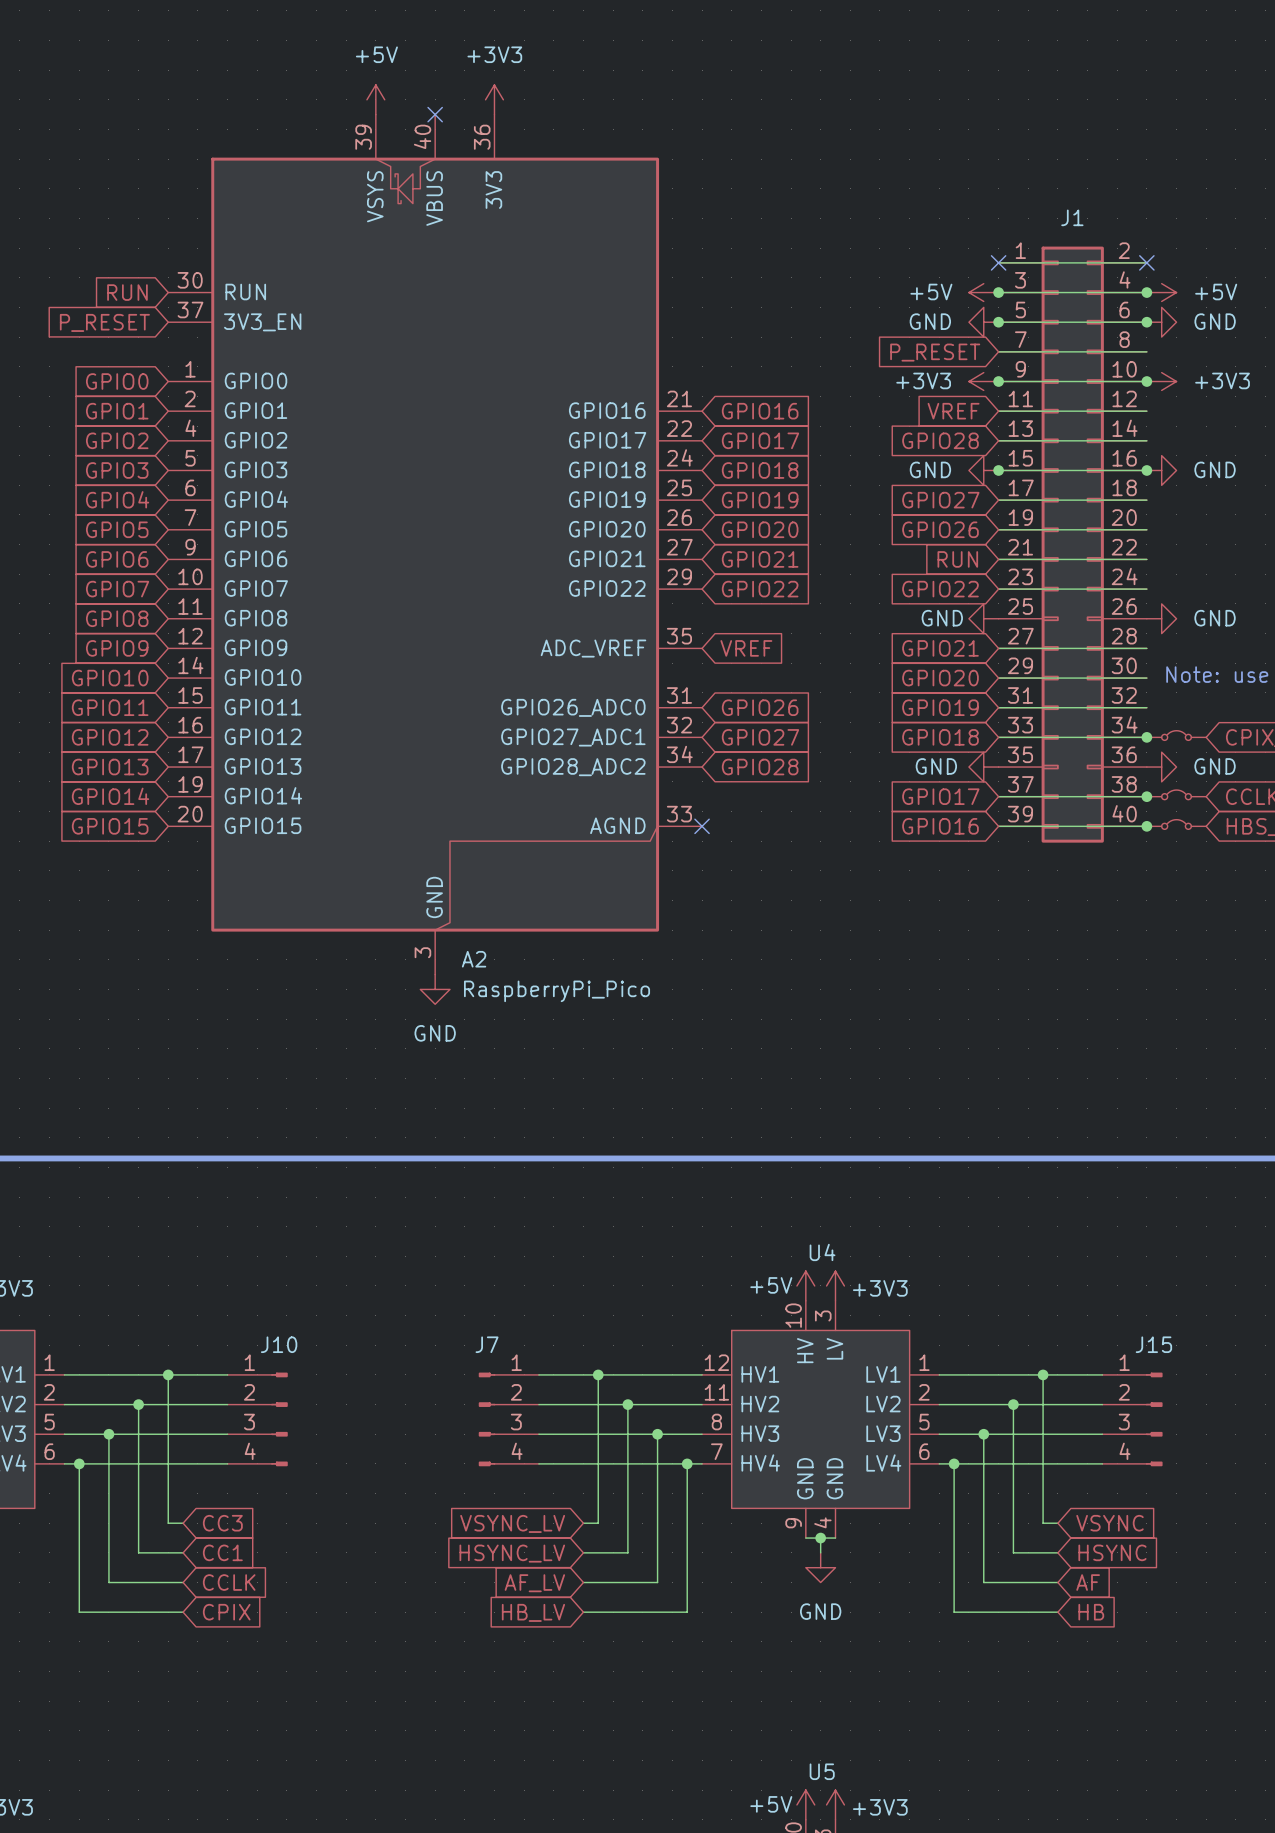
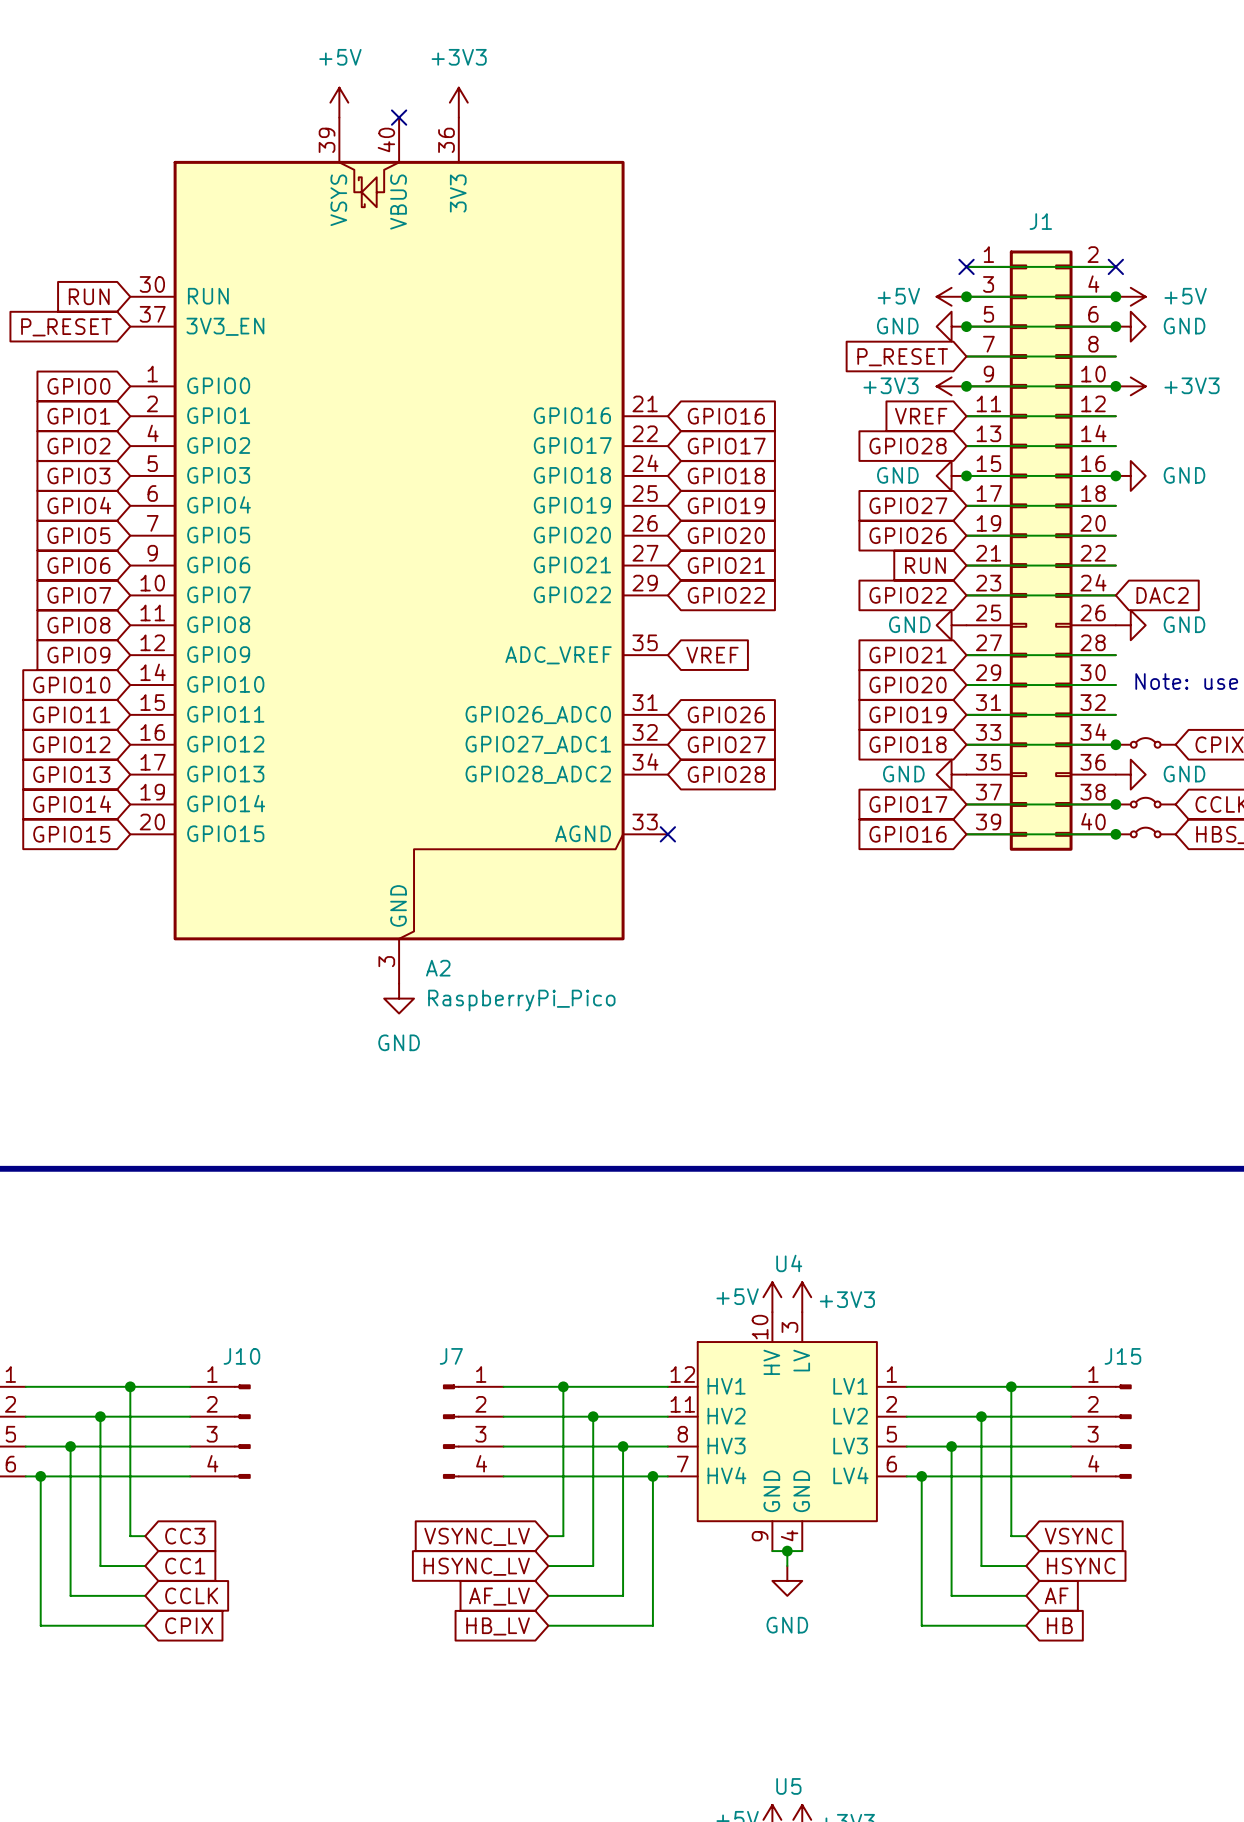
global label: none -> DAC2 (1162, 595)

